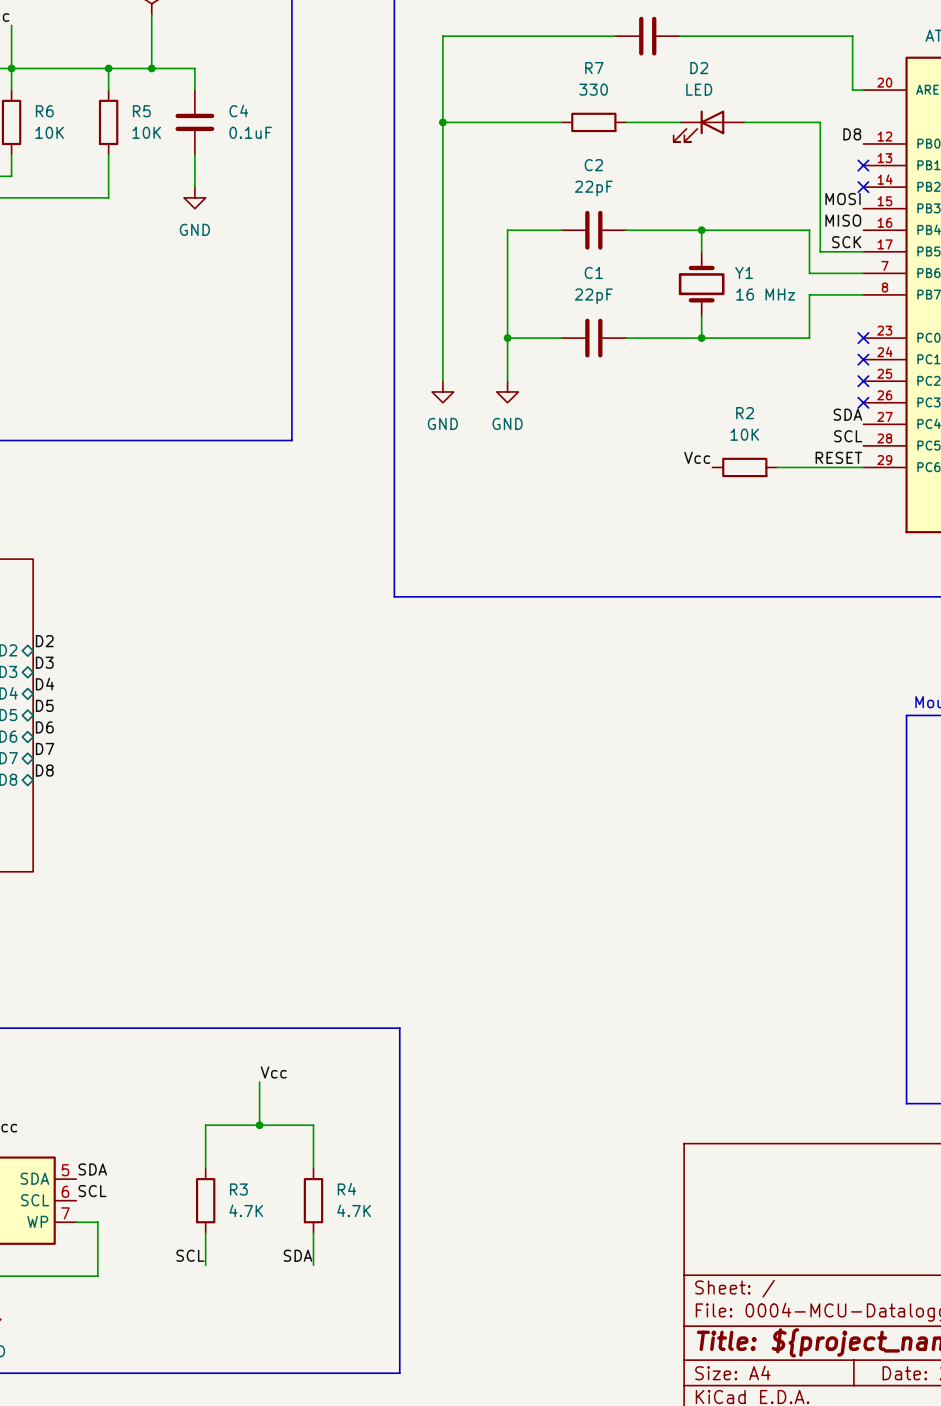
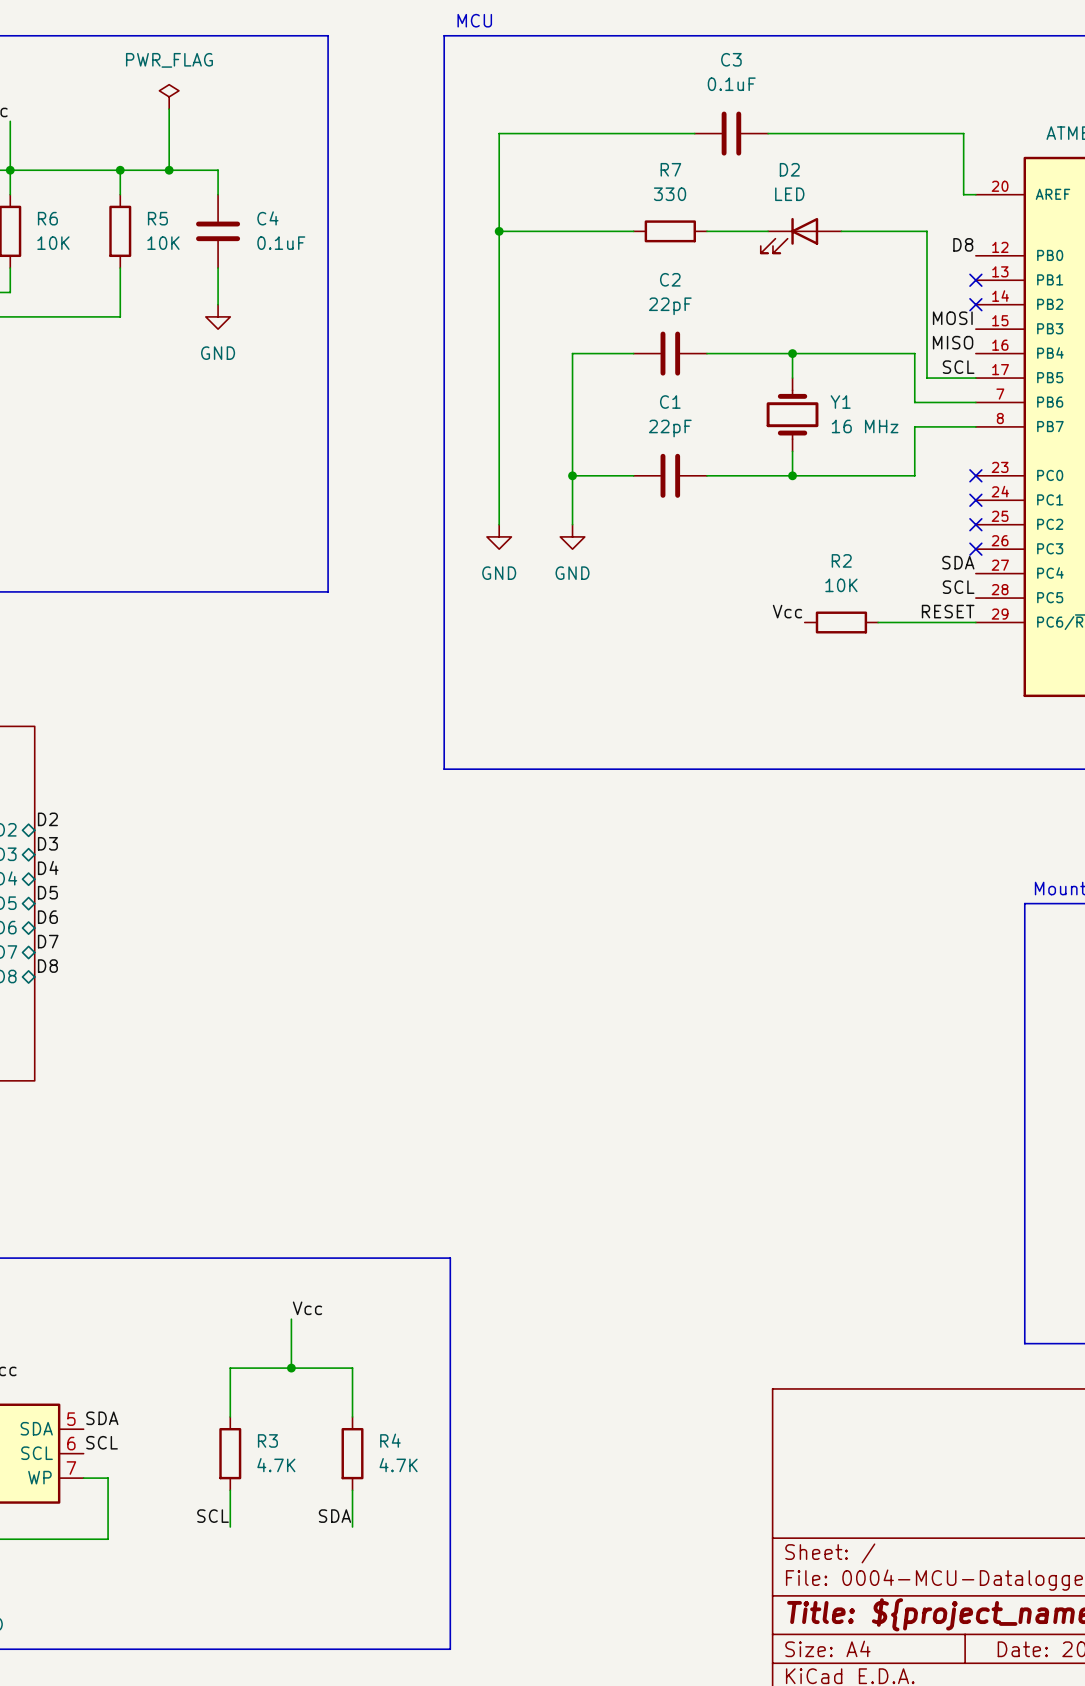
label: SCK (846, 242) -> SCL (958, 367)

